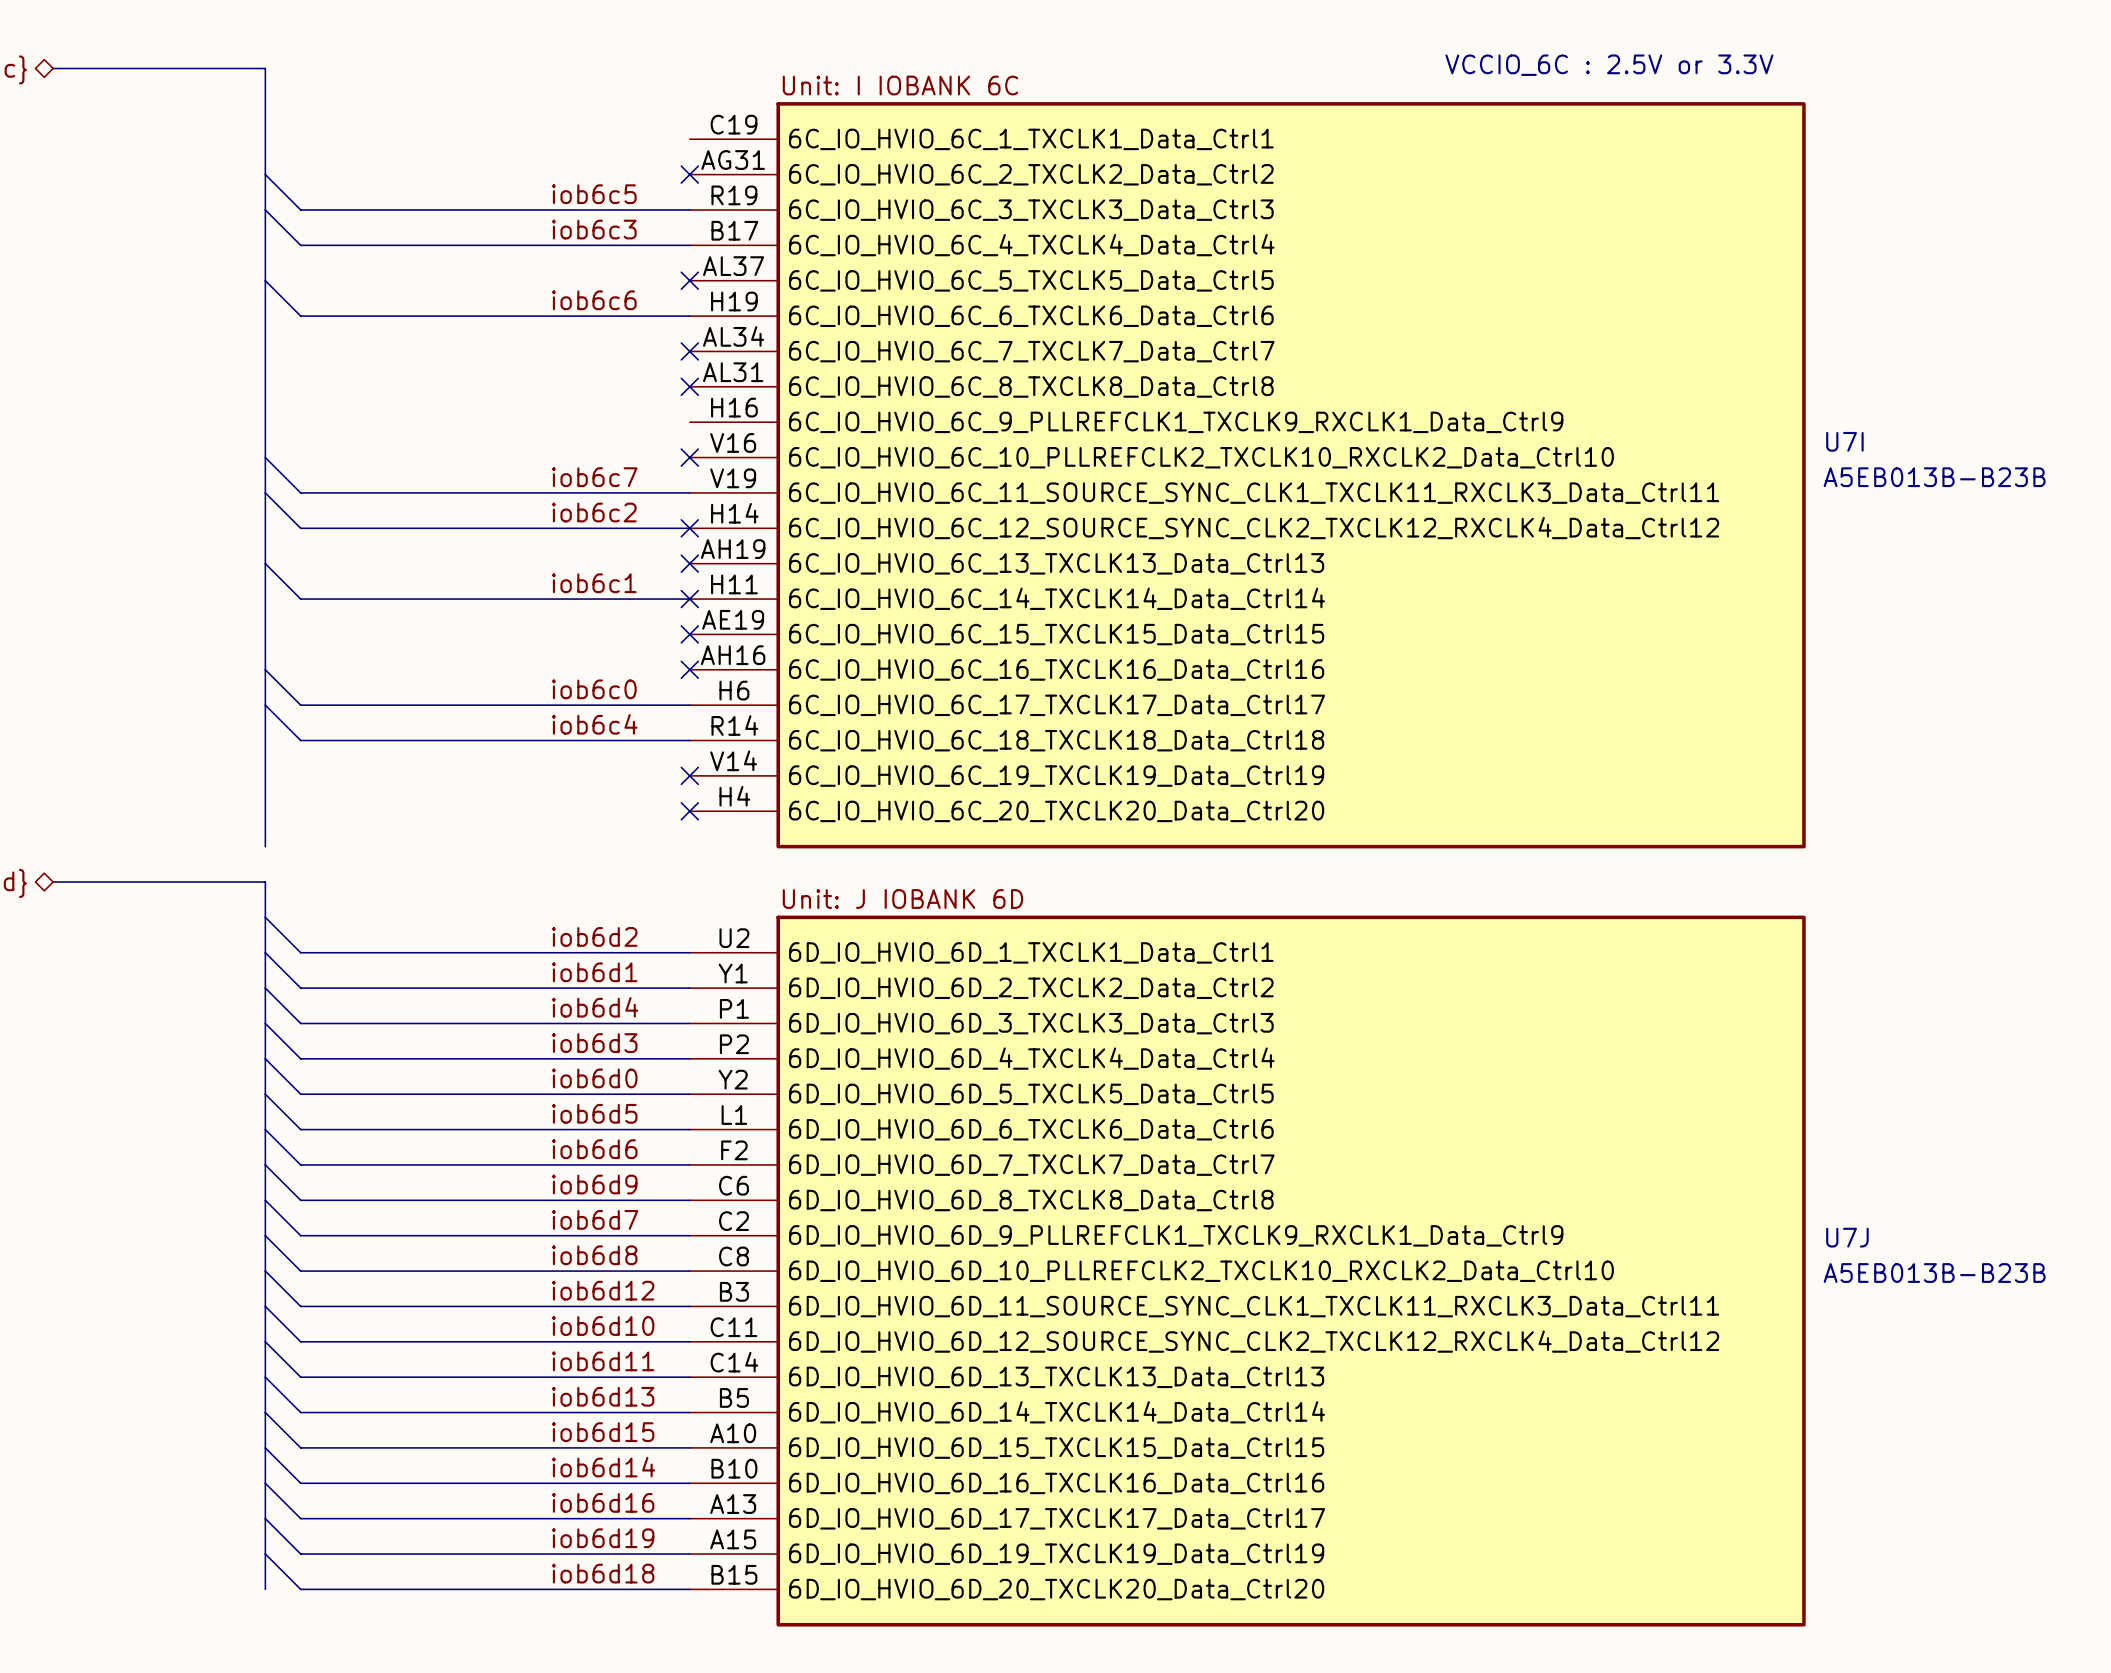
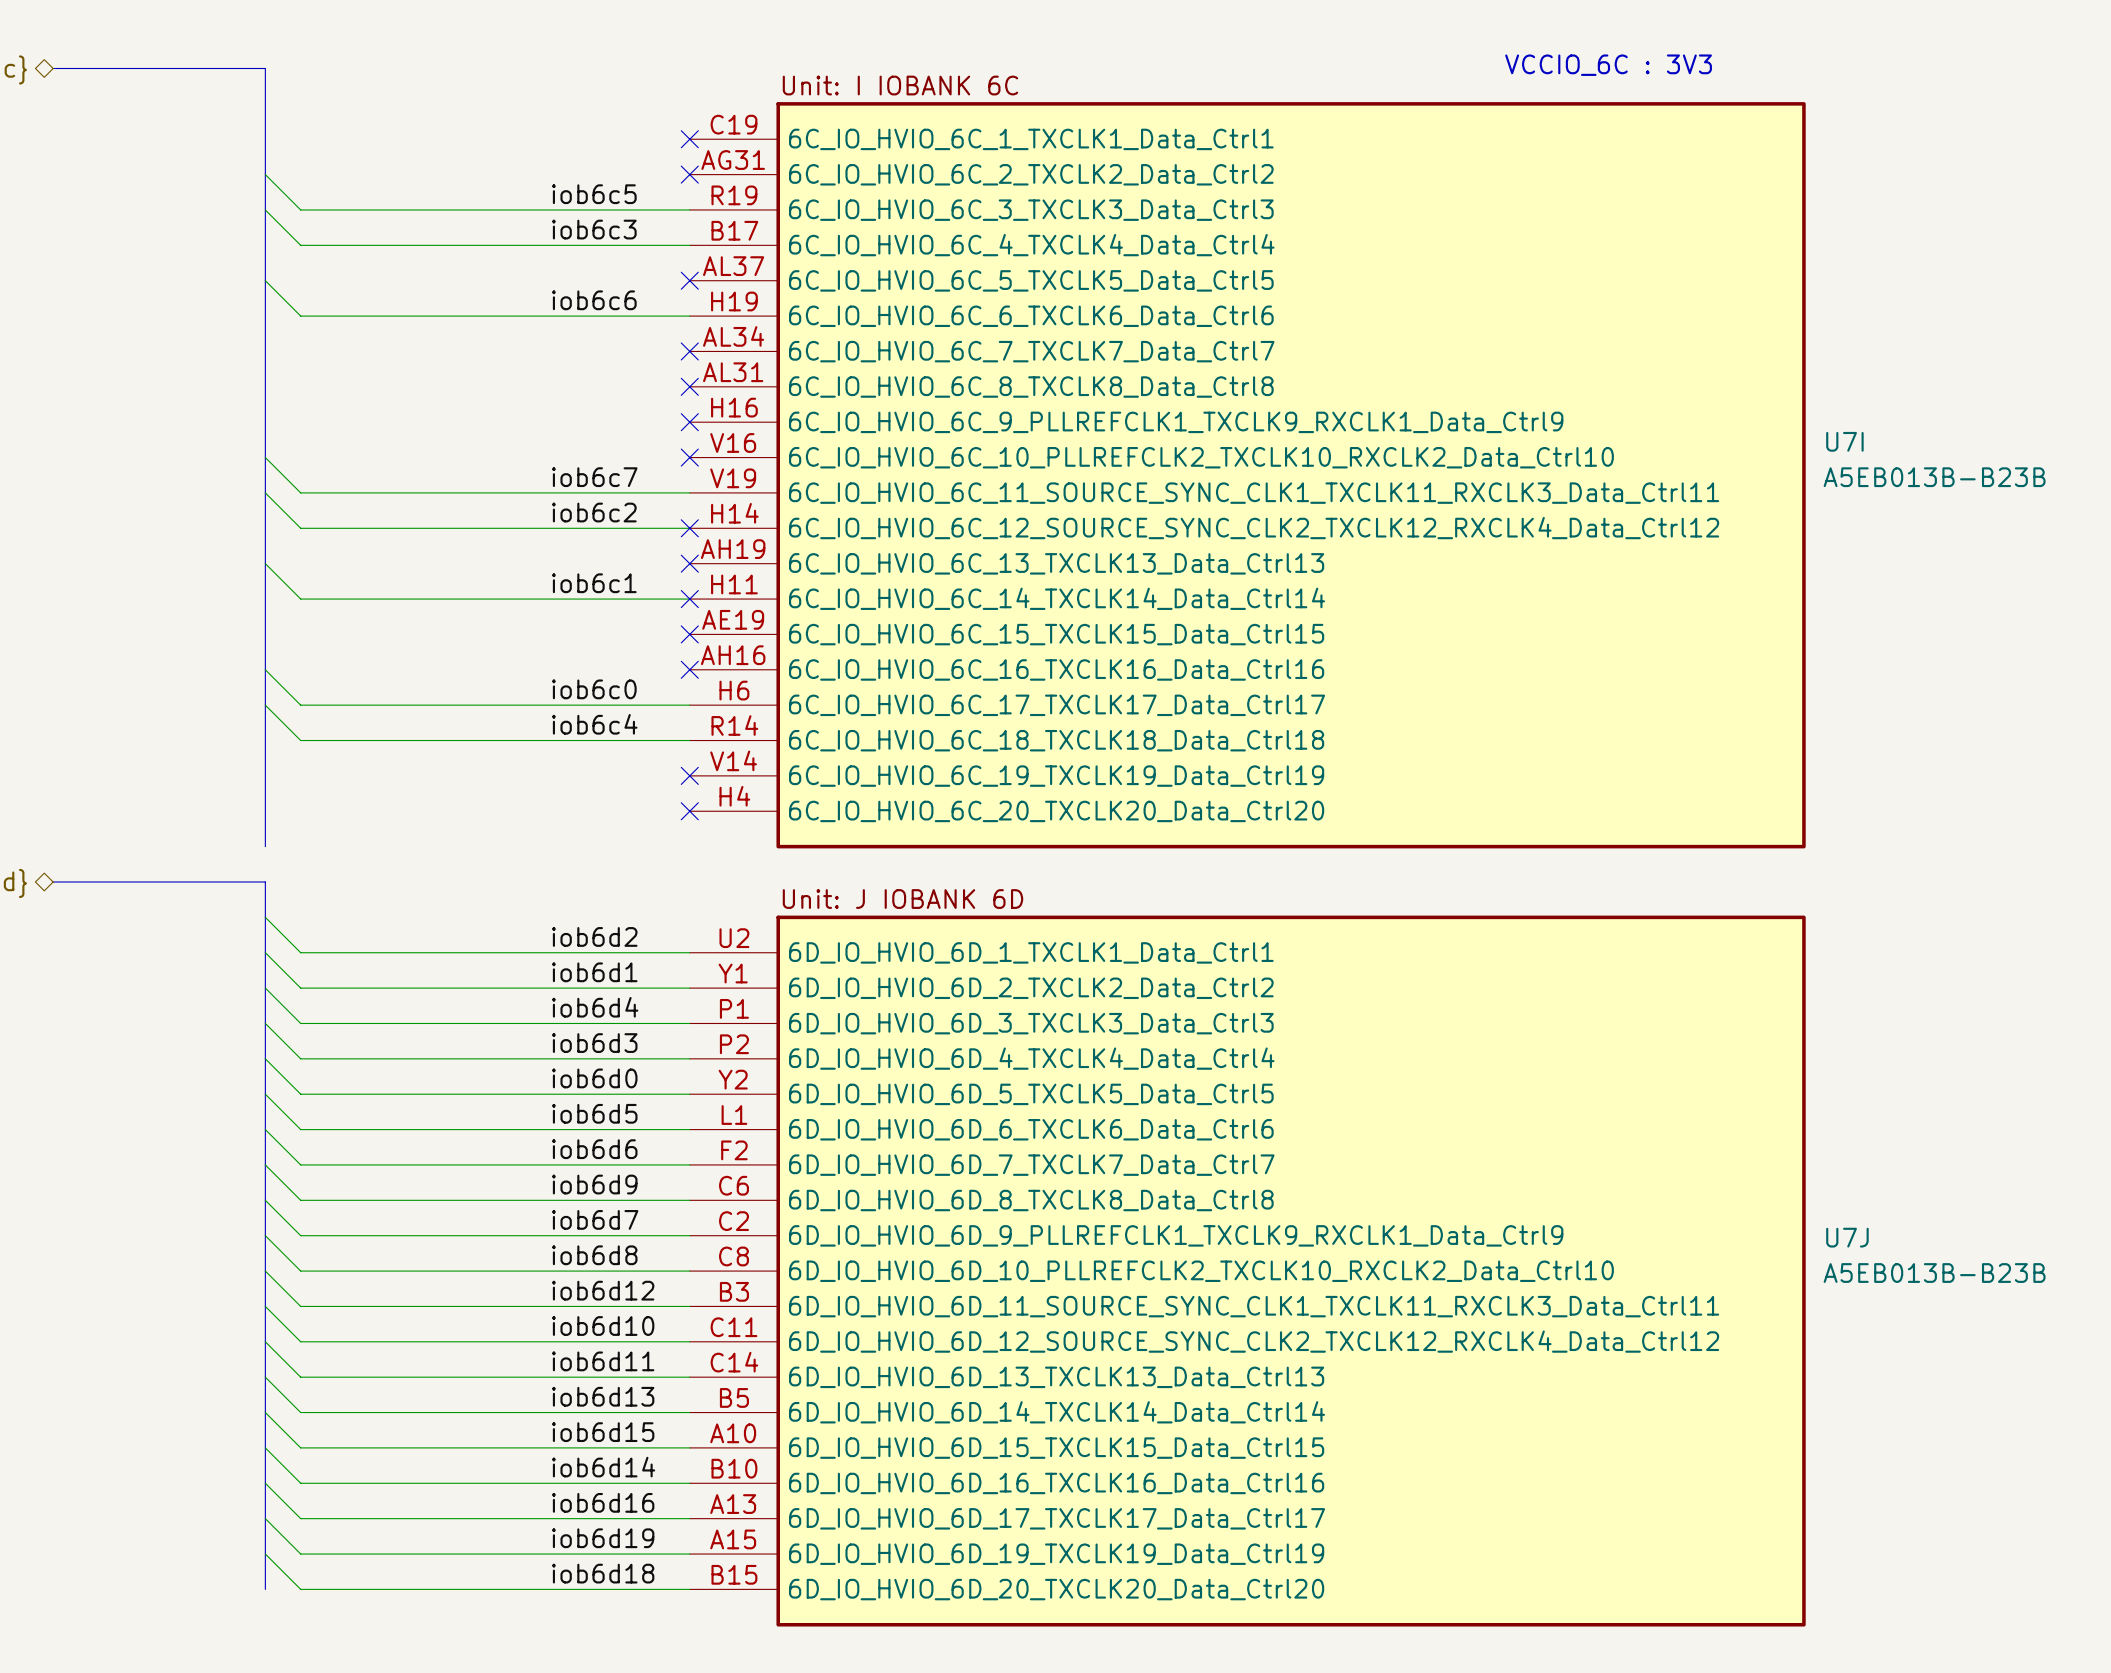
text: VCCIO_6C : 2.5V or 3.3V (1609, 65) -> VCCIO_6C : 3V3 (1608, 65)
no-connect mark: none -> (689, 139)
no-connect mark: none -> (689, 422)

